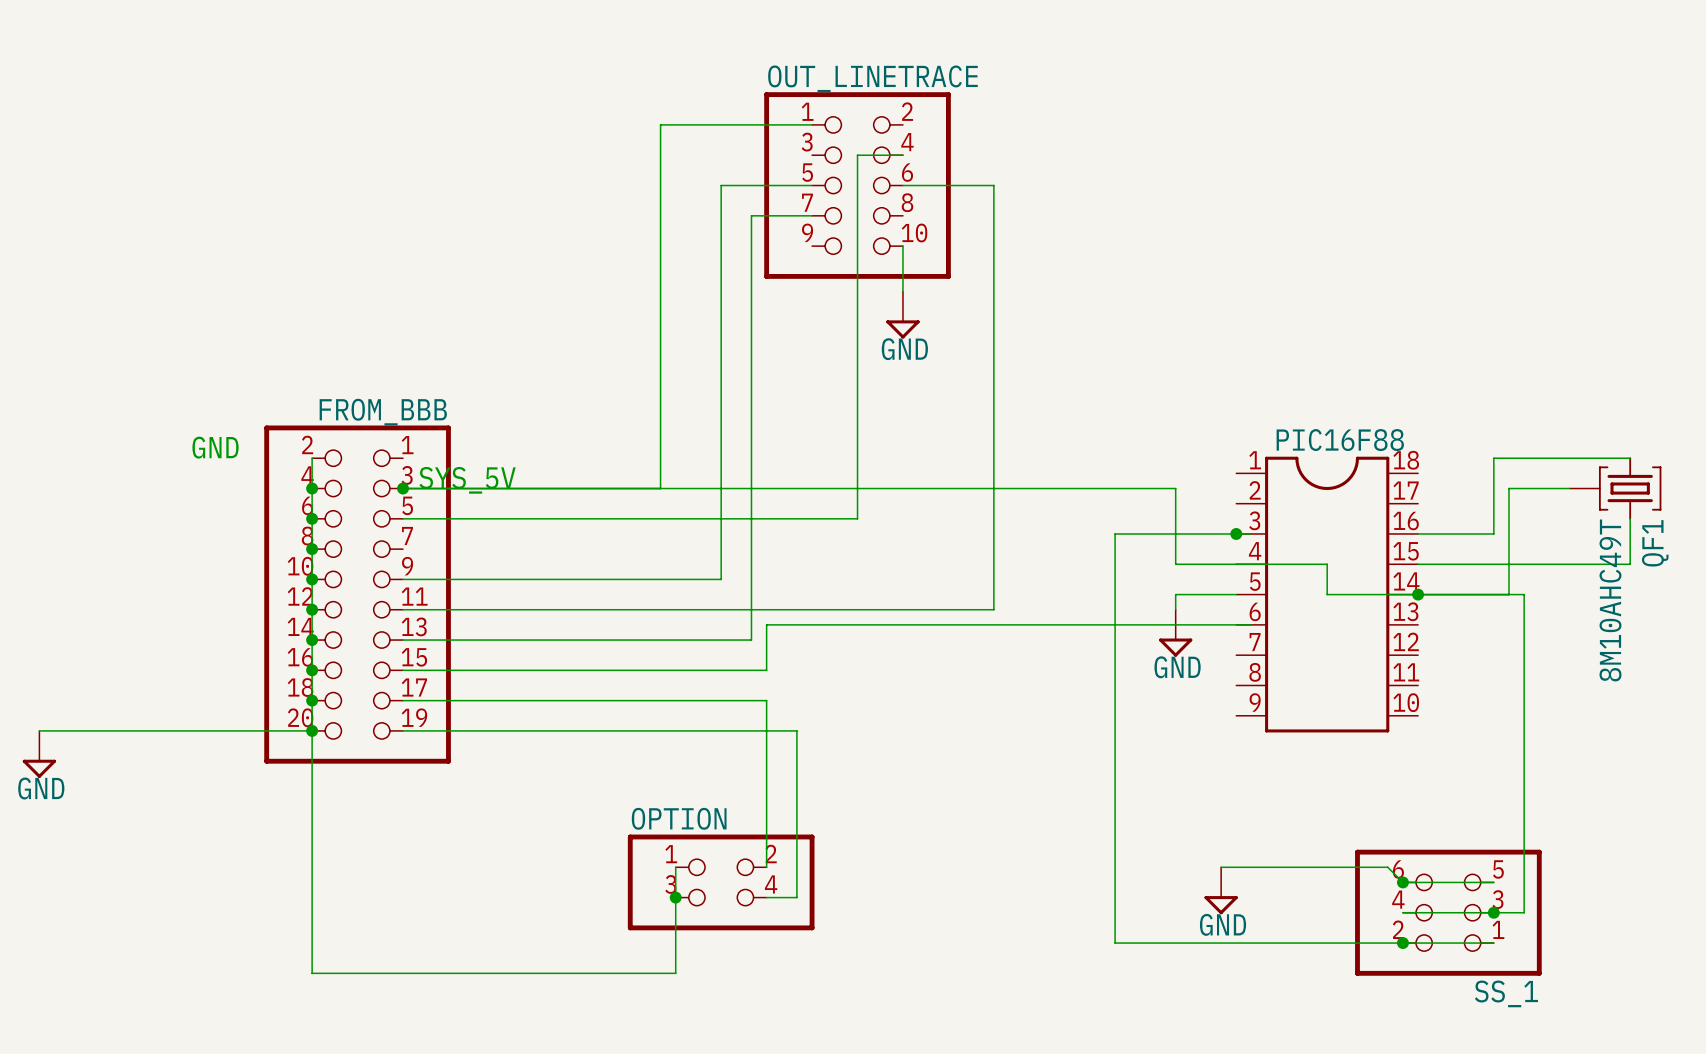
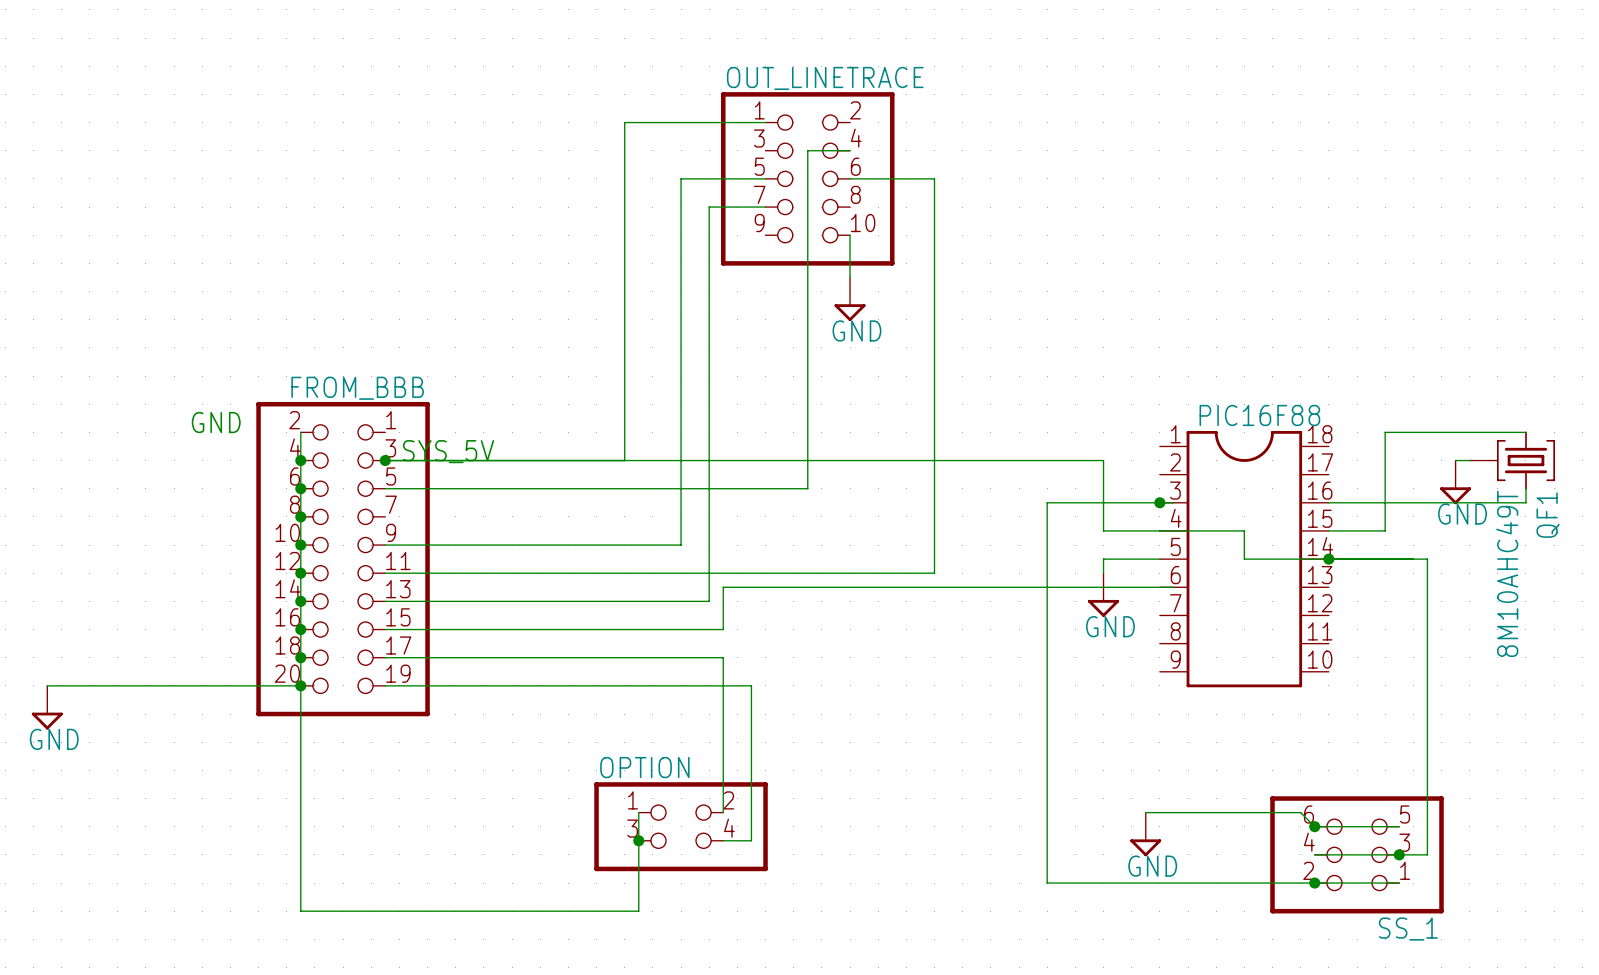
wire: (1493, 458) (1493, 533) -> (1399, 432) (1385, 432) (1385, 530)
wire: (1554, 488) (1508, 488) (1508, 594) -> none
power symbol: none -> GND (1455, 482)
wire: (1630, 533) (1630, 564) (1478, 564) -> (1525, 502) (1399, 502)

